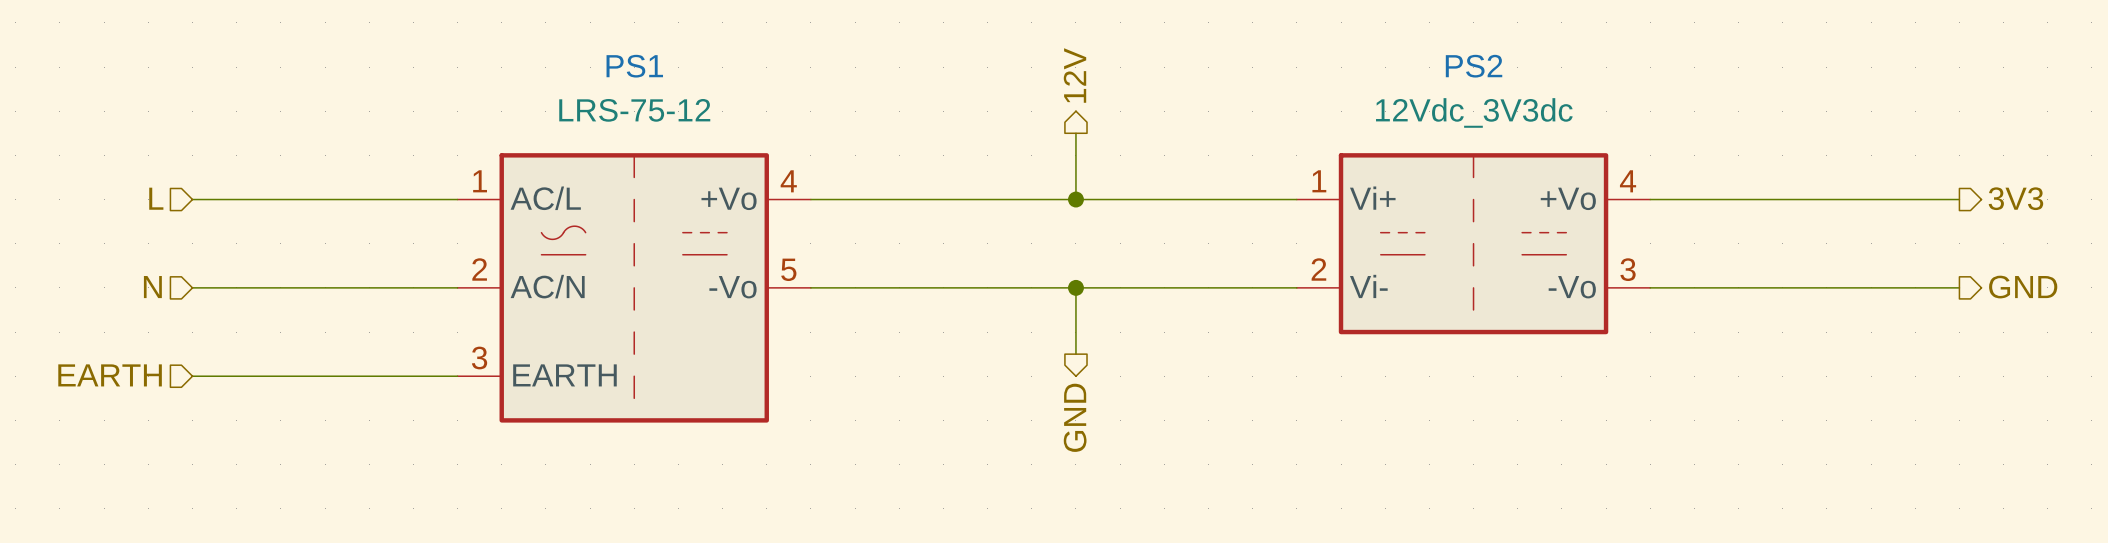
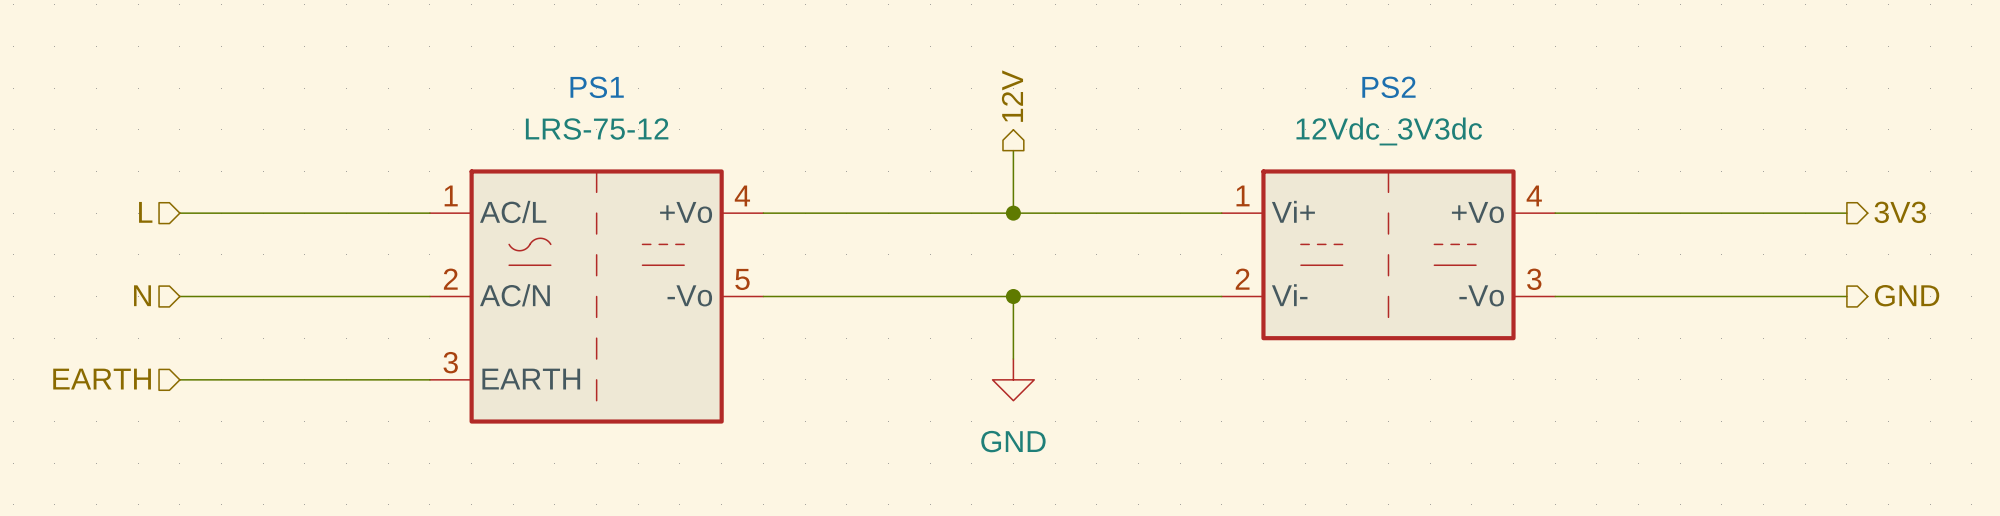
power symbol: none -> GND (1013, 379)
hierarchical label: GND (1075, 417) -> none

